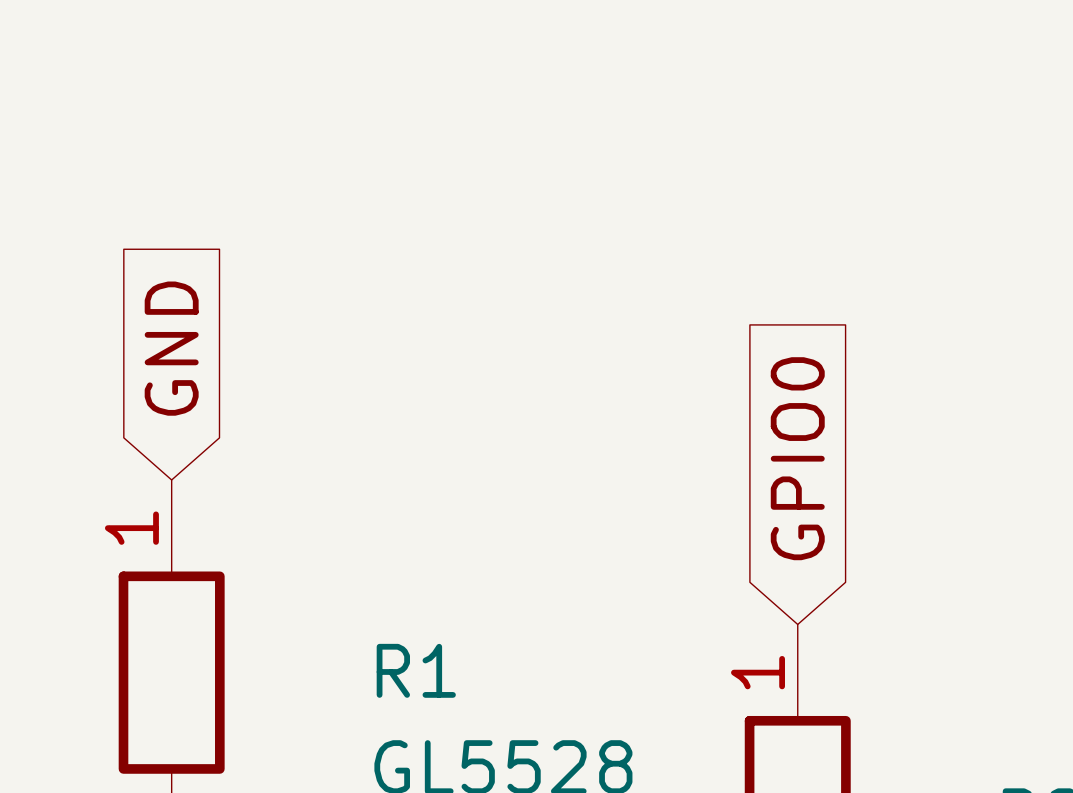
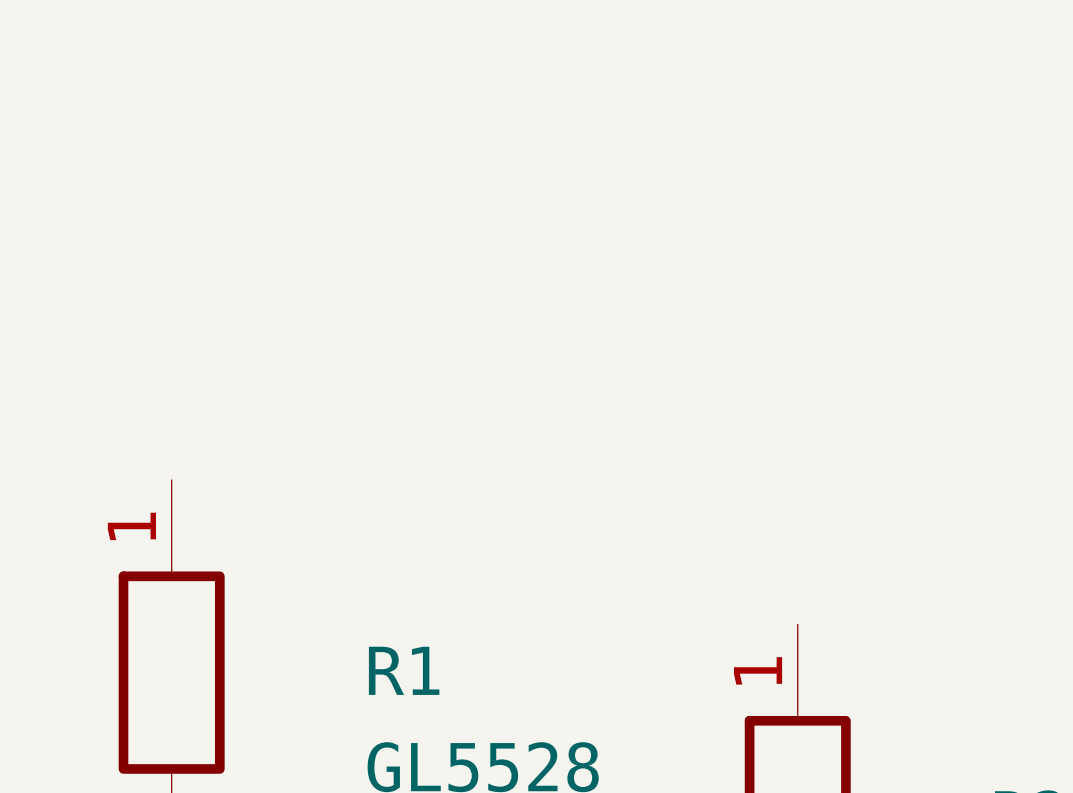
global label: GND (171, 348) -> none
global label: GPIO0 (797, 458) -> none

